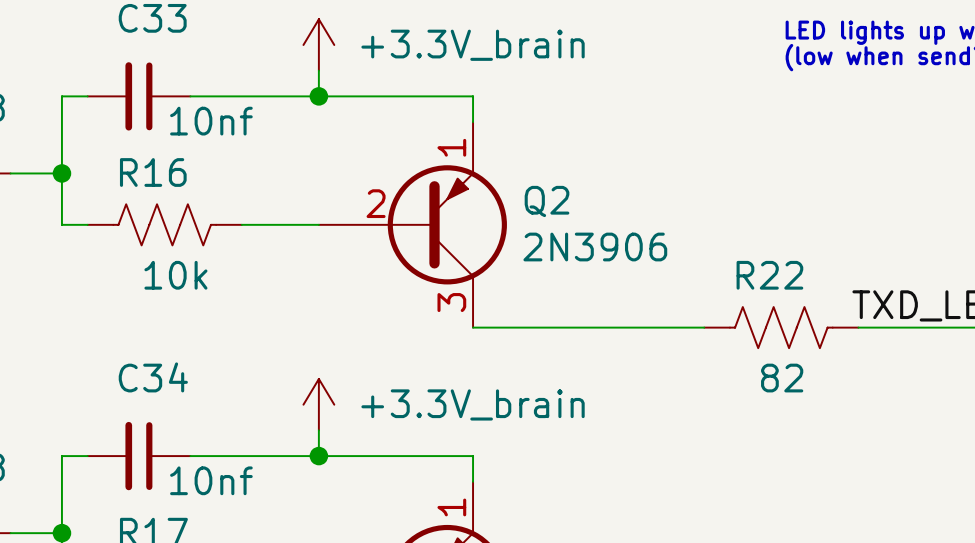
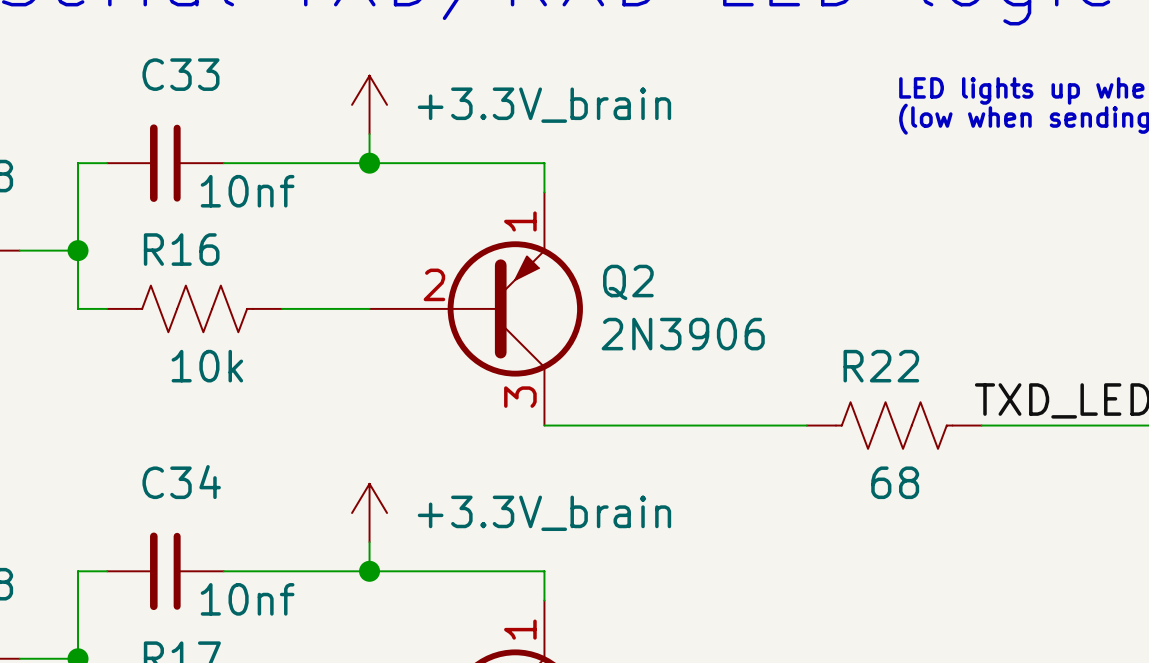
R22 value: 82 (782, 378) -> 68 (895, 482)

